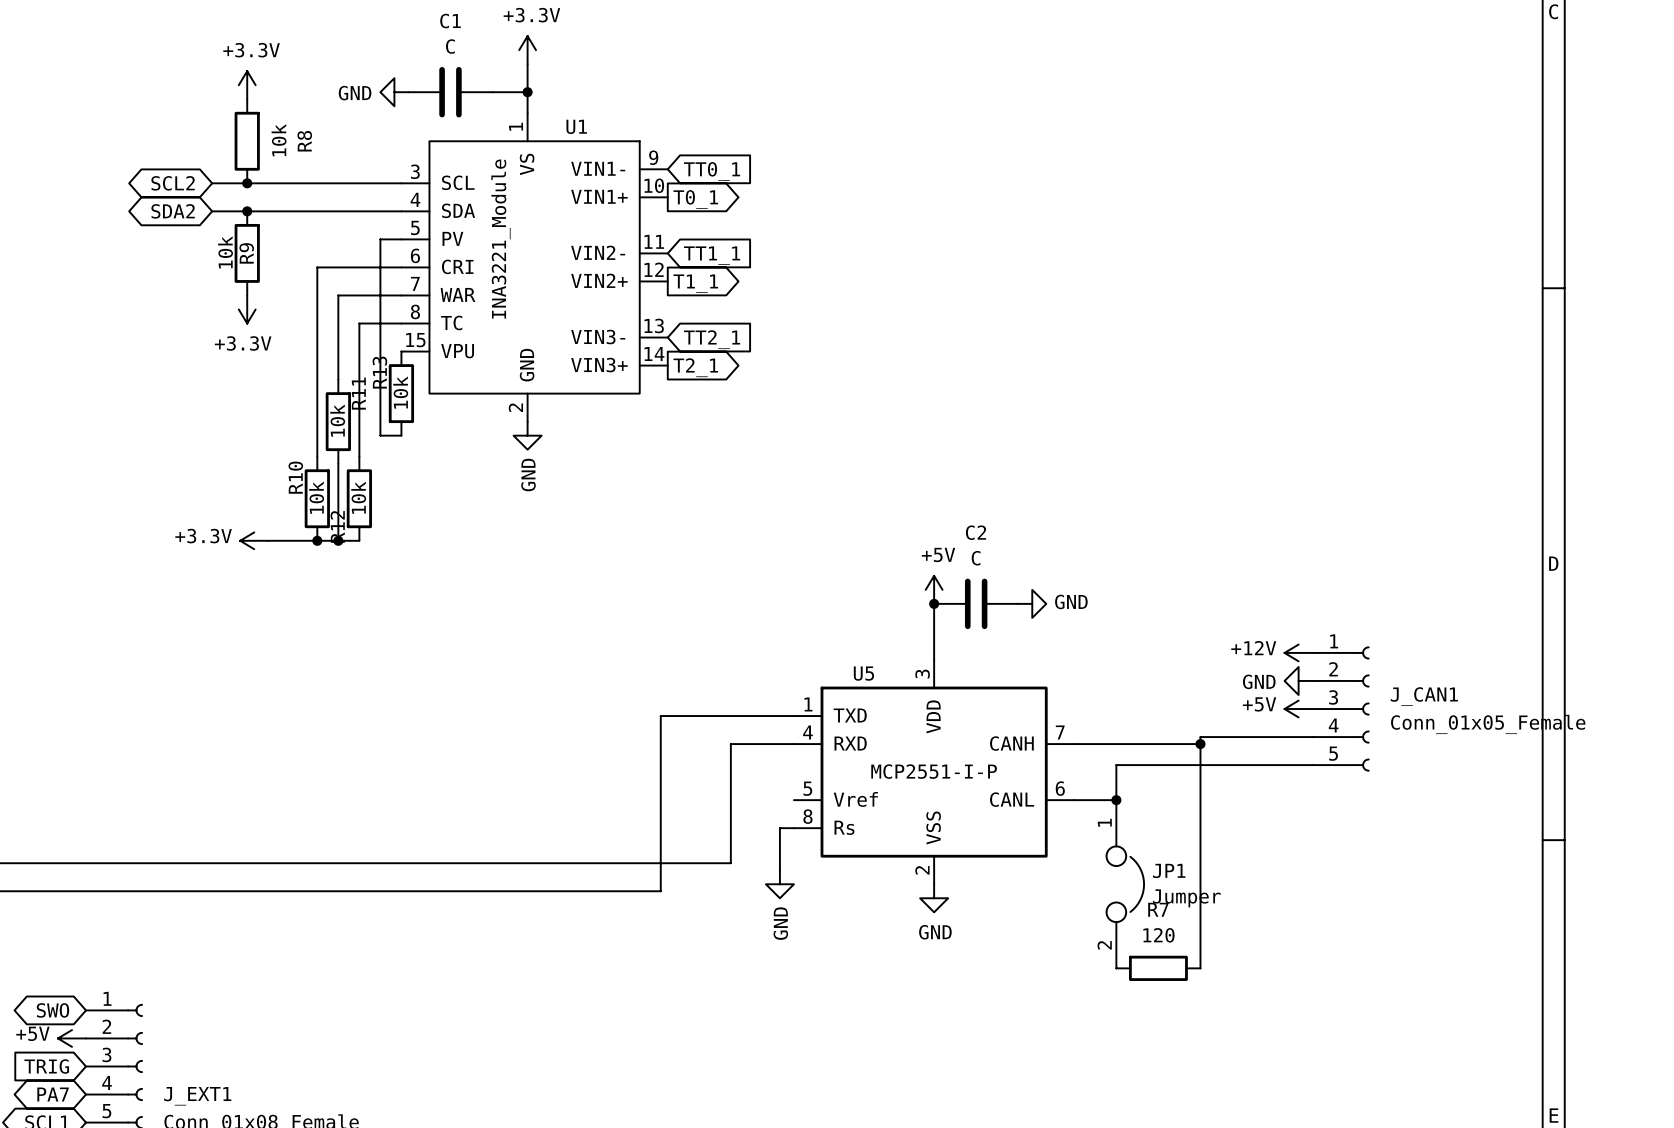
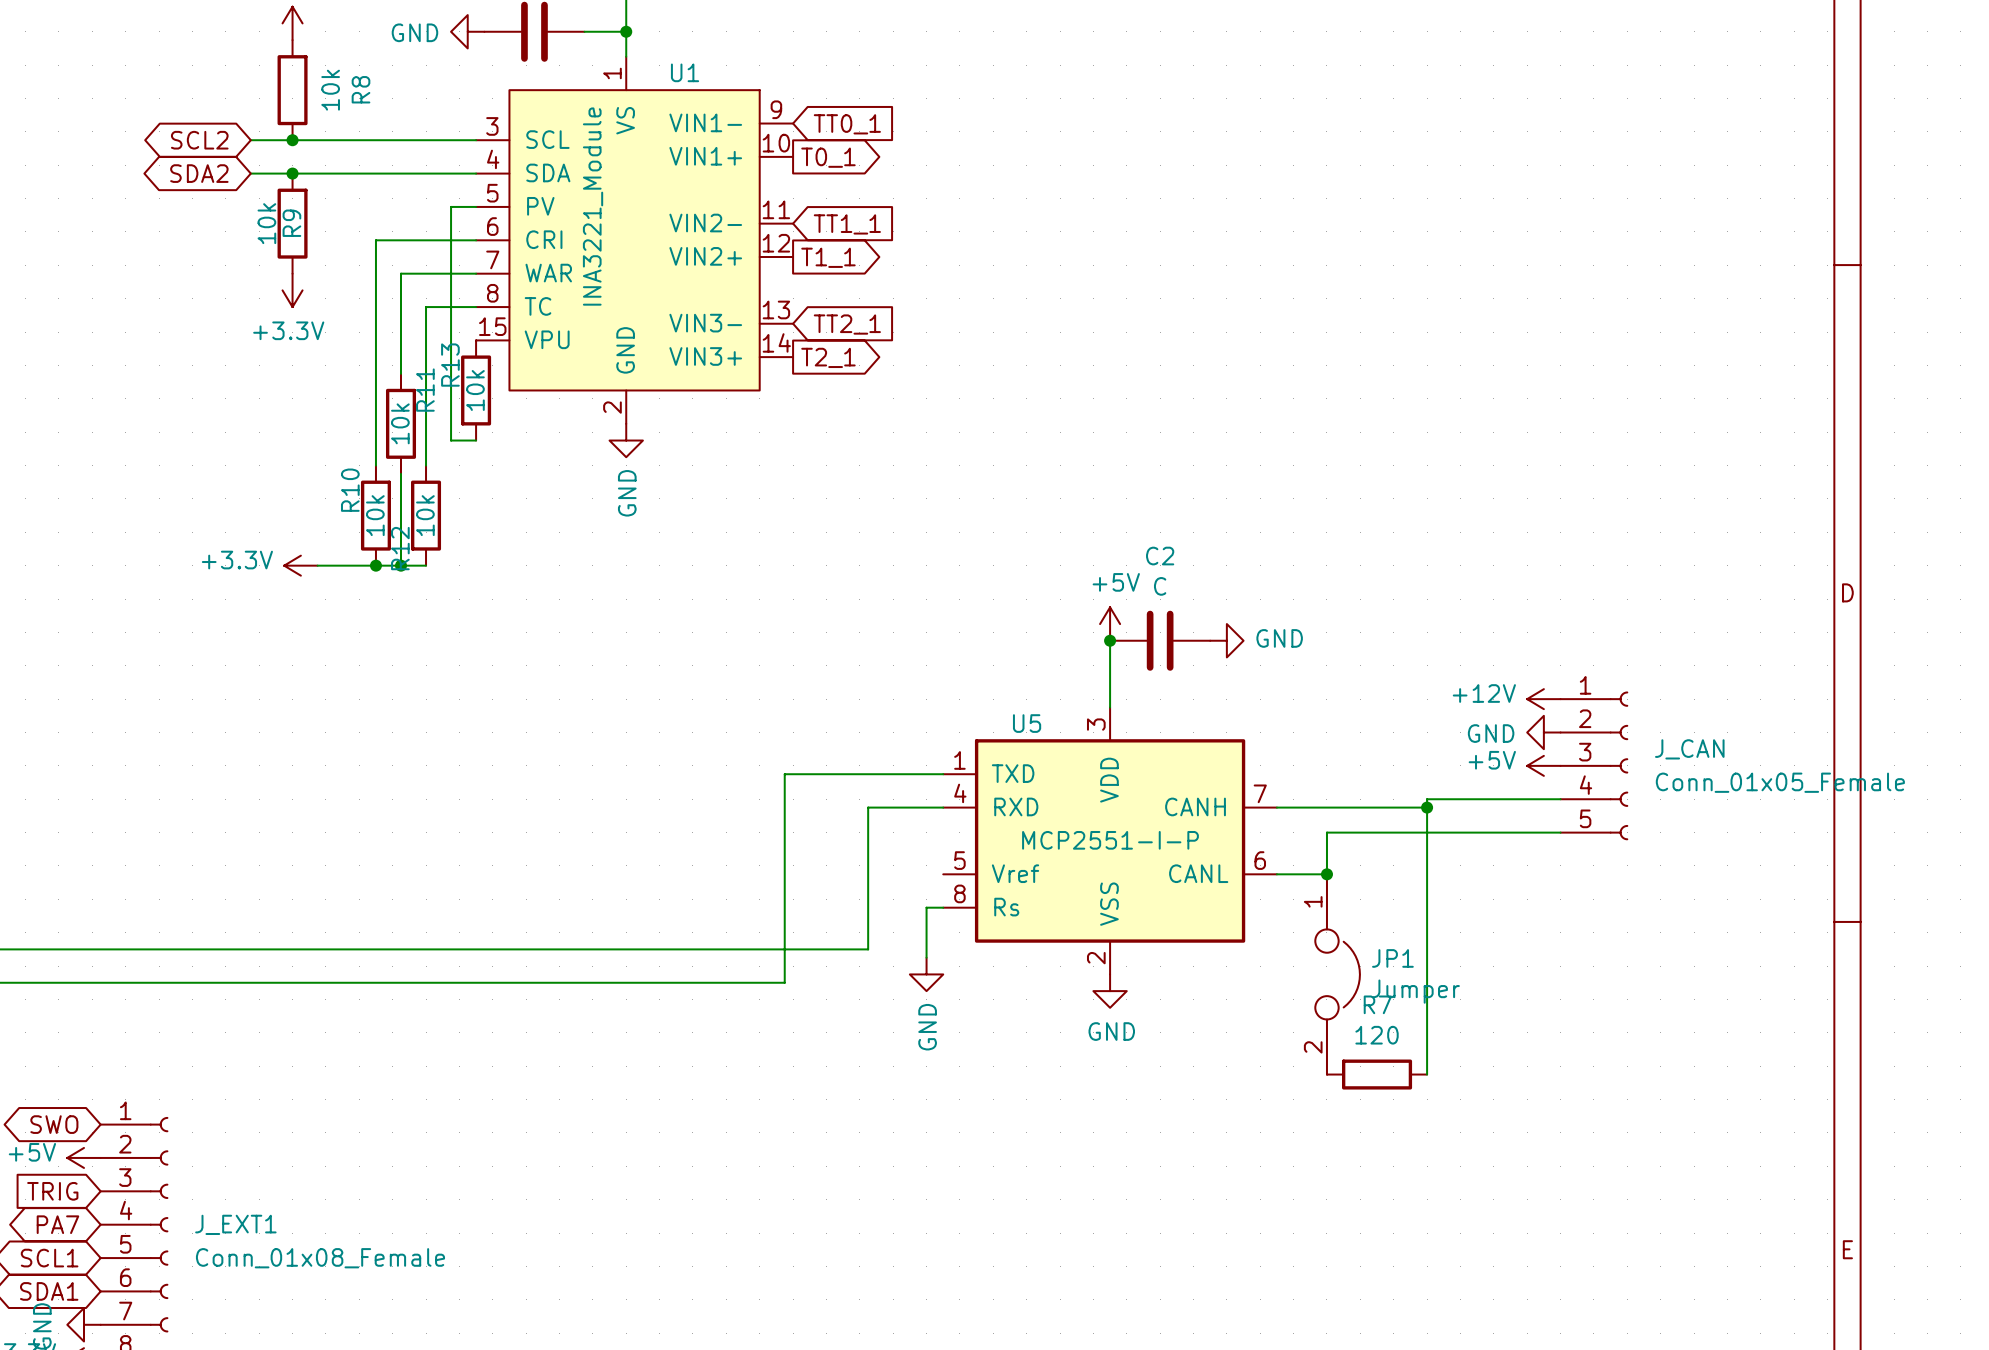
J_CAN1 name: J_CAN1 (1424, 696) -> J_CAN (1689, 749)

